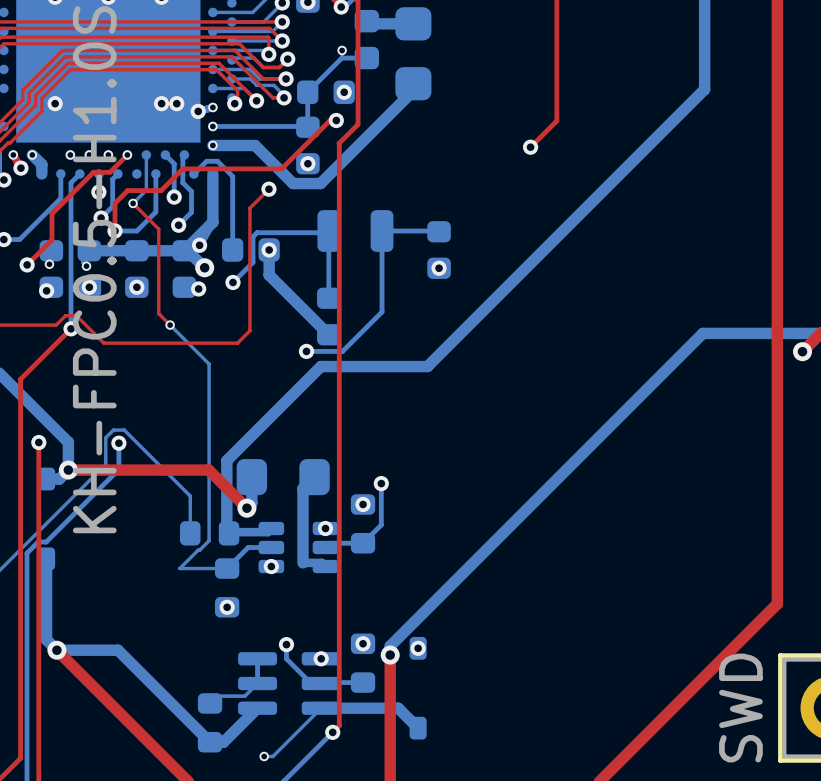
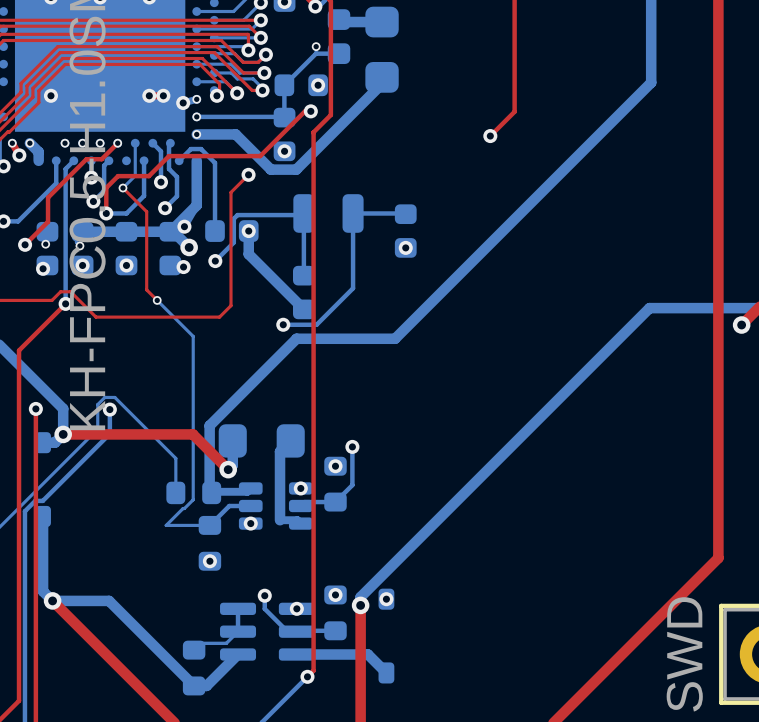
bottom track: (321, 708) (272, 756) (264, 756) -> none
via: (264, 756) -> none

